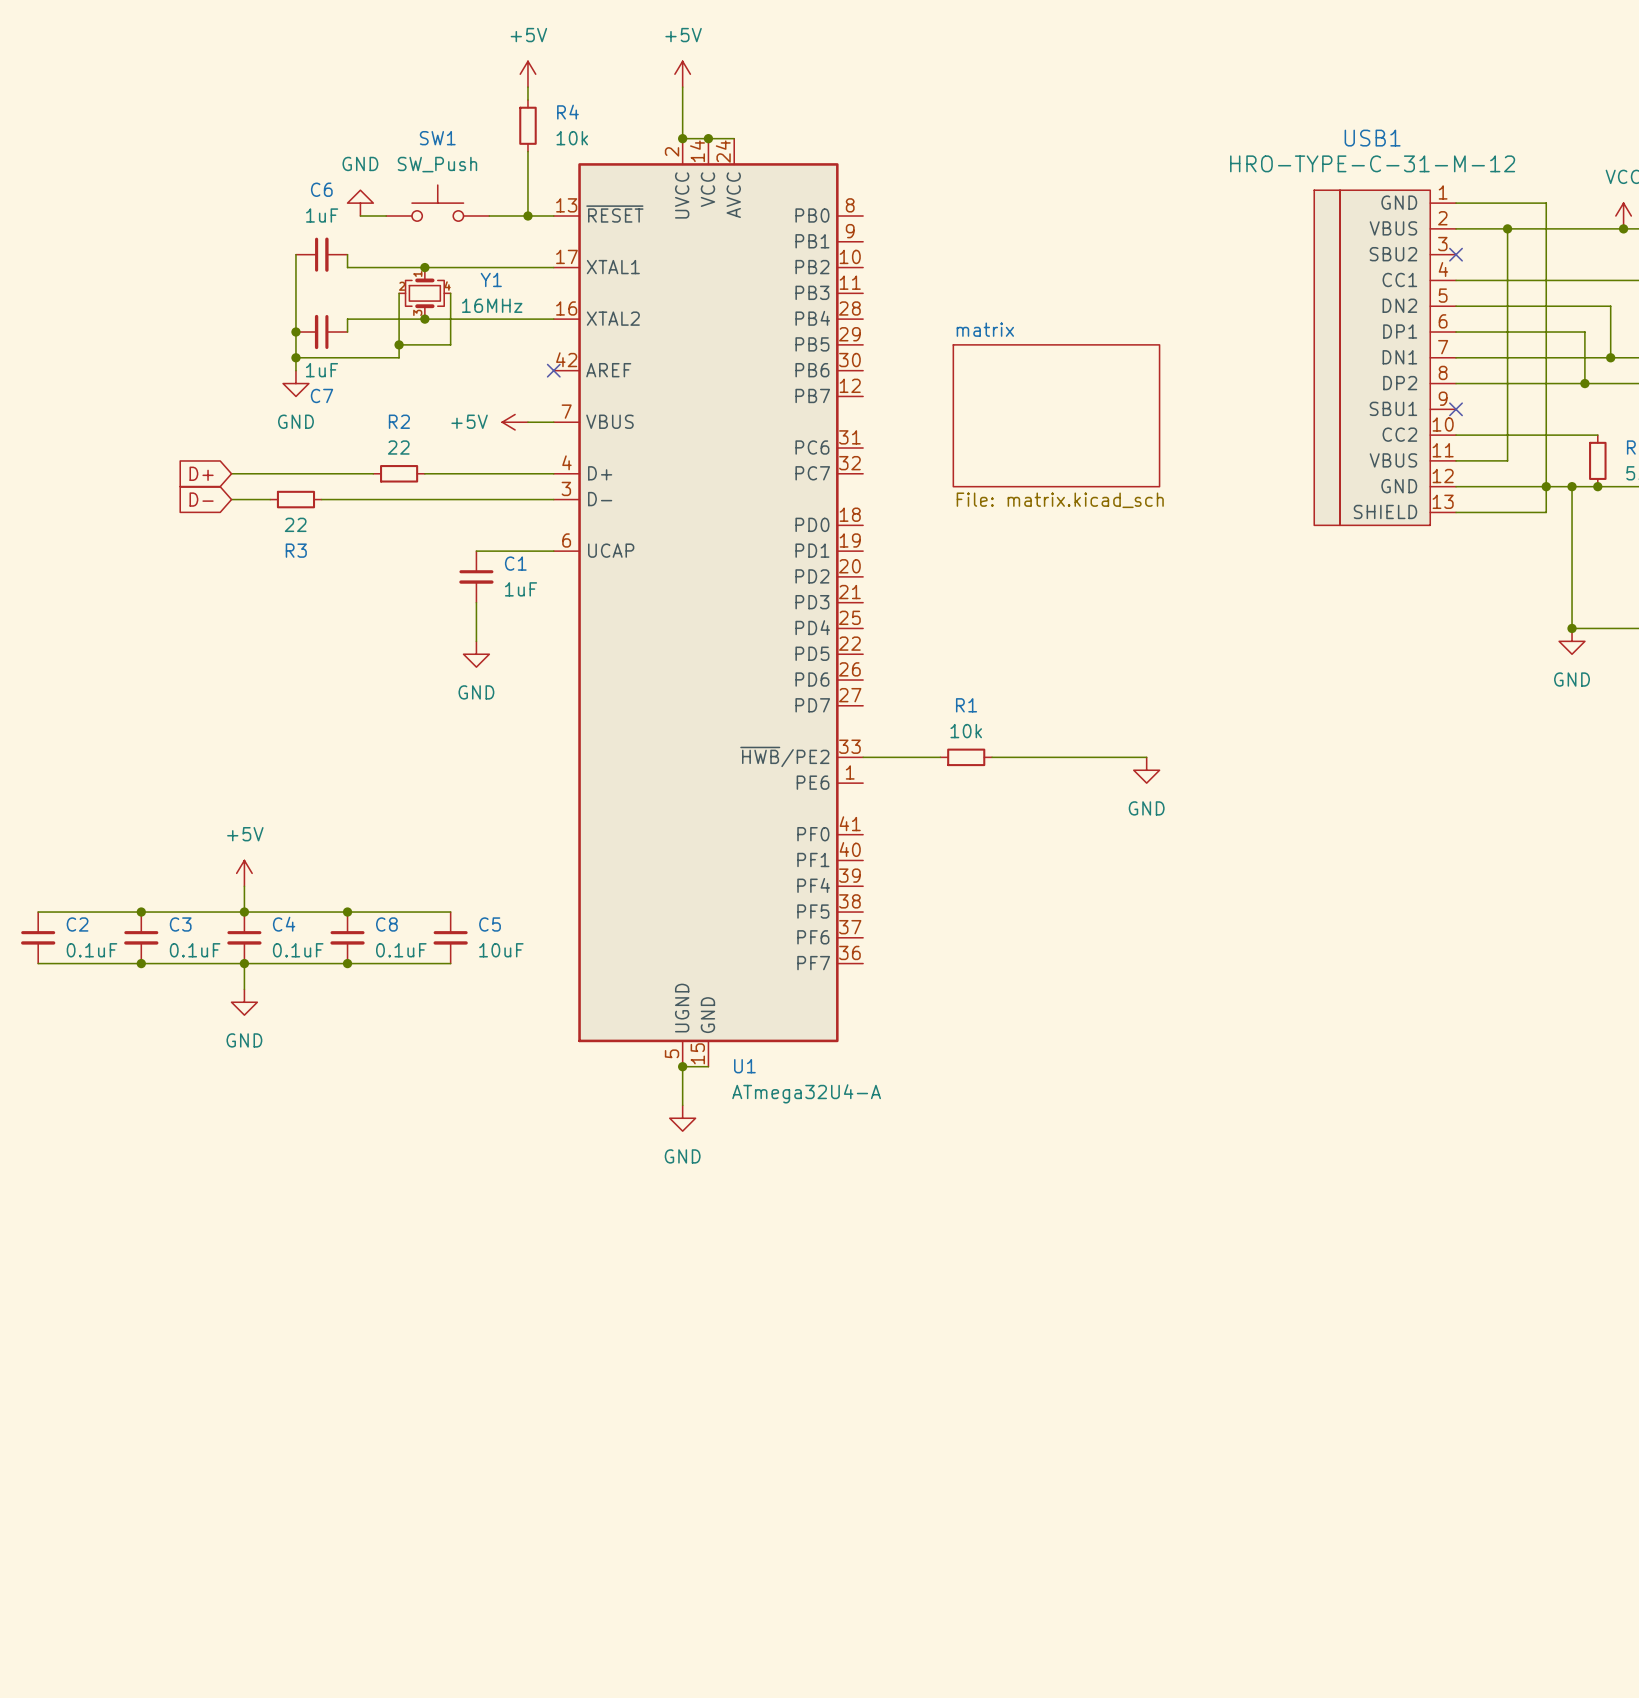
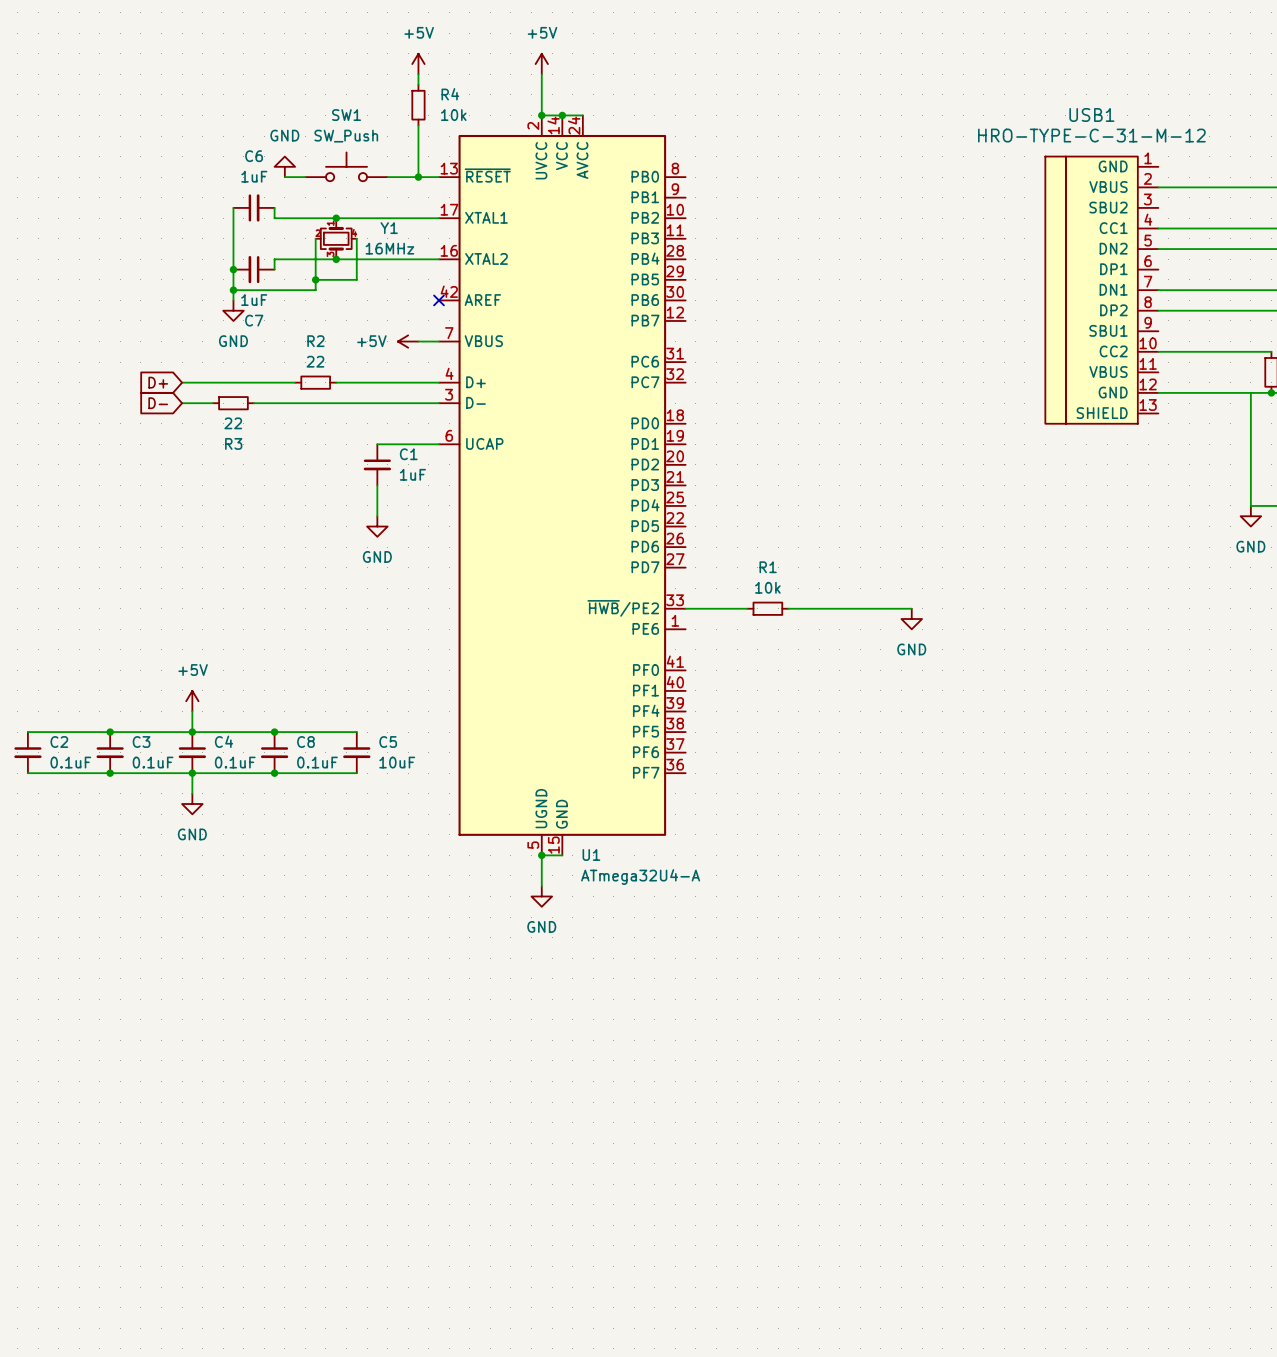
wire: (1456, 203) (1546, 203) (1546, 512) (1456, 512) -> none
wire: (1507, 228) (1507, 460) (1456, 460) -> none
junction: (1507, 228) -> none
no-connect mark: (1456, 254) -> none
wire: (1456, 332) (1584, 332) (1584, 383) -> none
junction: (1584, 383) -> none
no-connect mark: (1456, 409) -> none
sheet matrix: File: matrix.kicad_sch (1056, 415) -> none
junction: (1546, 486) -> none
junction: (1572, 486) -> none
junction: (1572, 628) -> none

